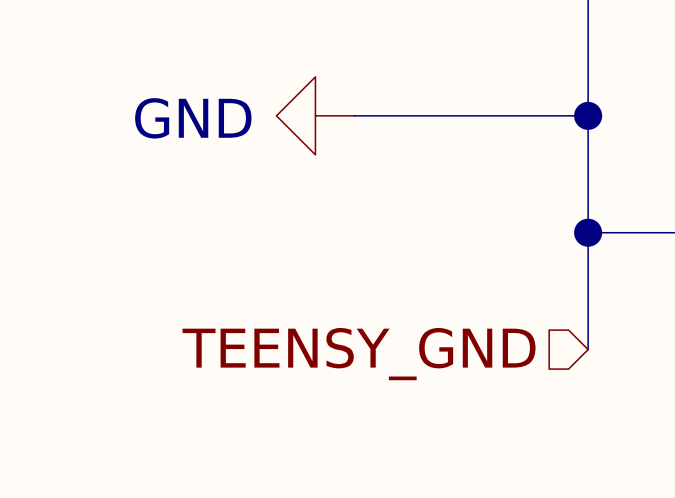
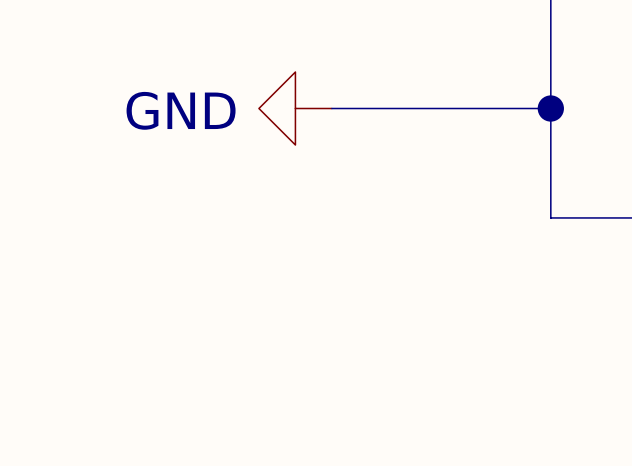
wire: (588, 232) (588, 349) -> none
junction: (588, 232) -> none
hierarchical label: TEENSY_GND (359, 354) -> none

